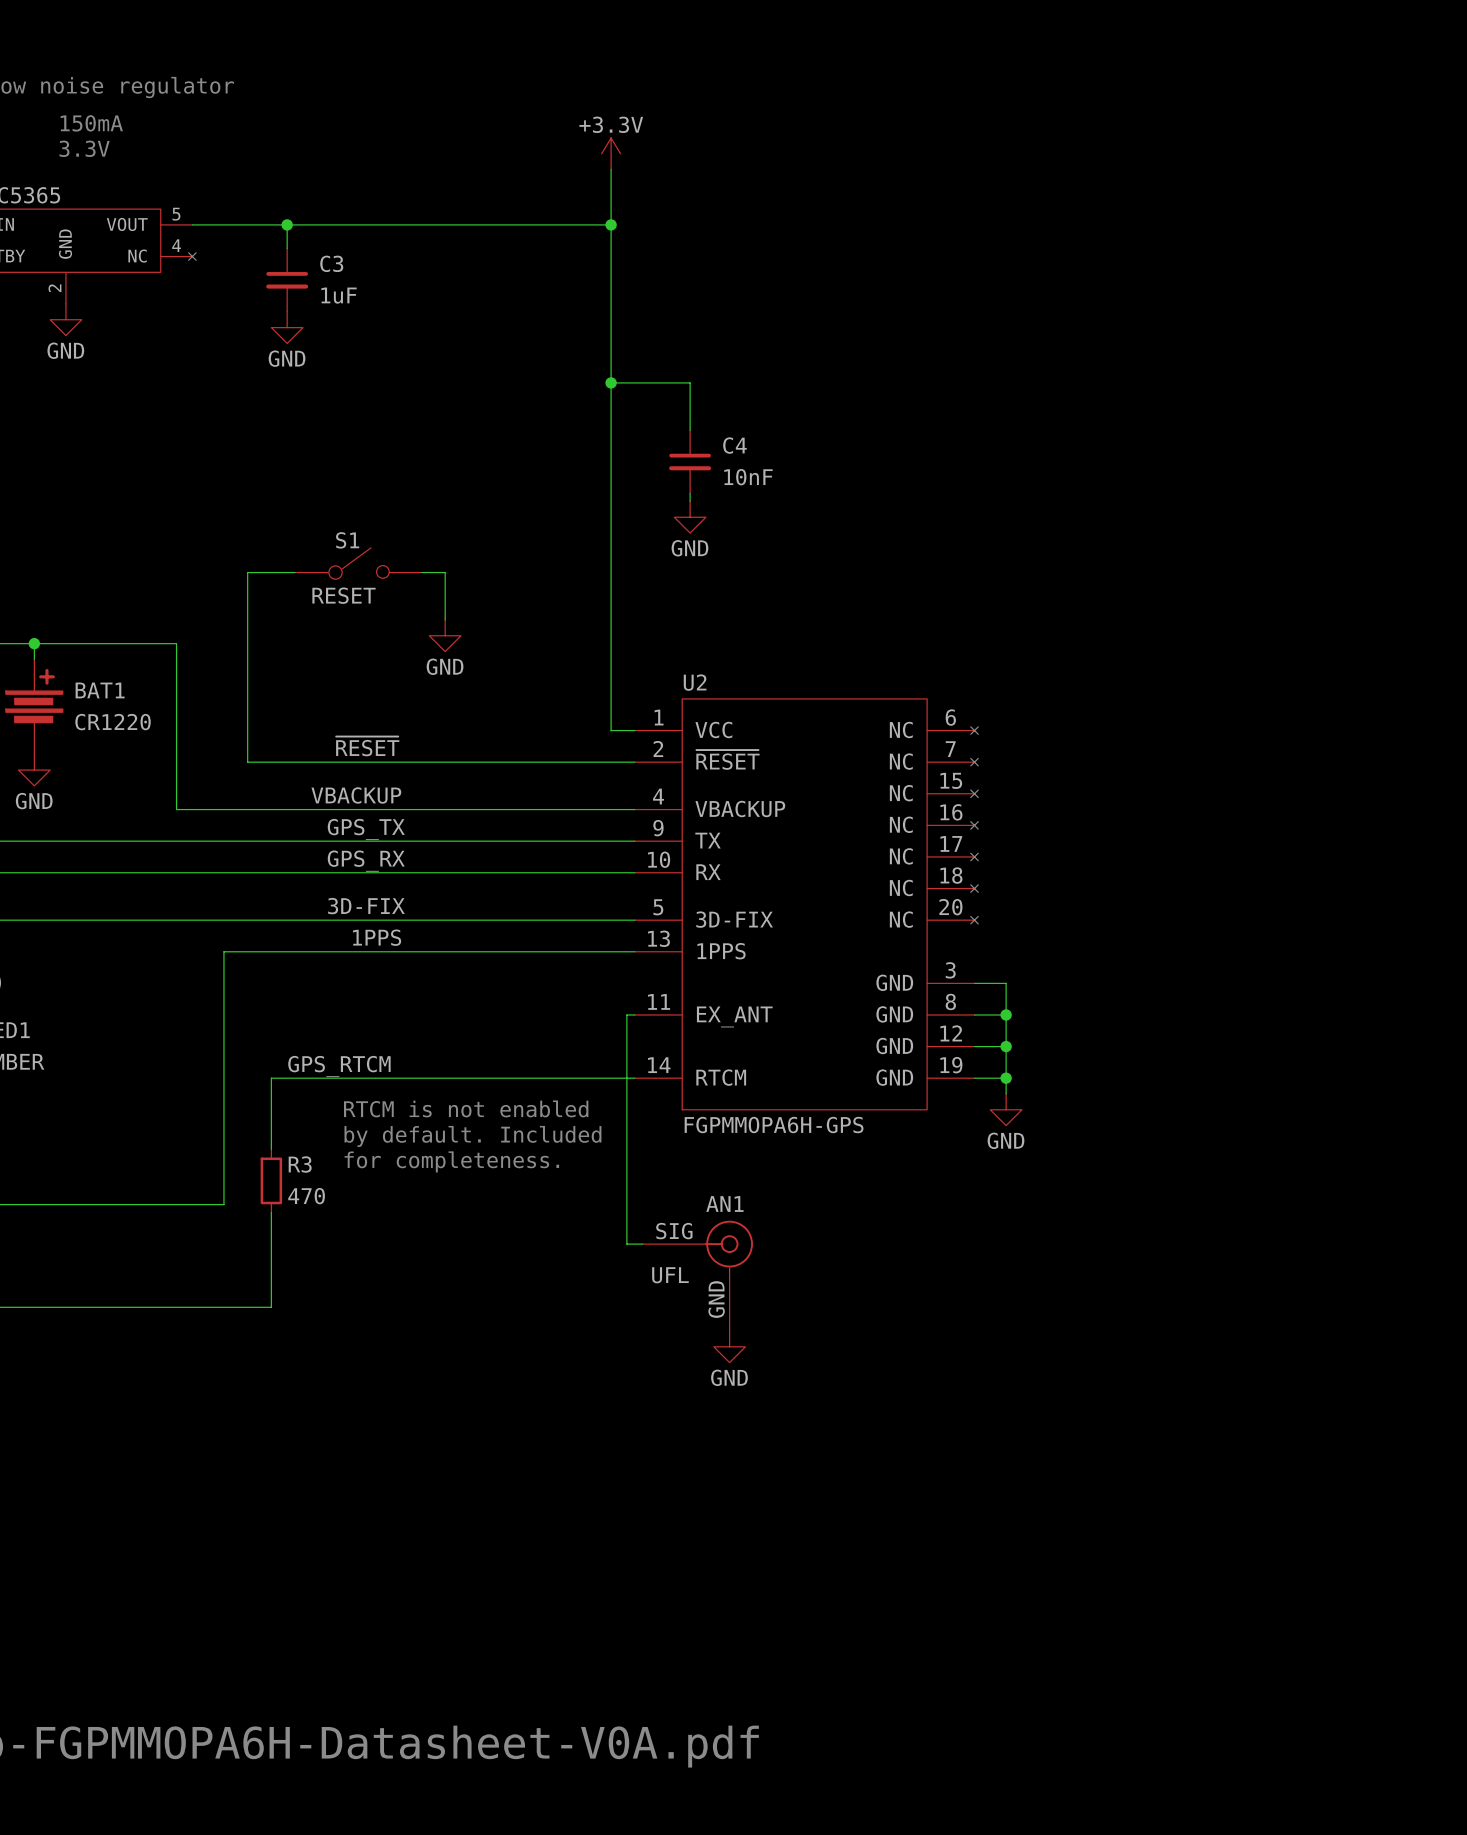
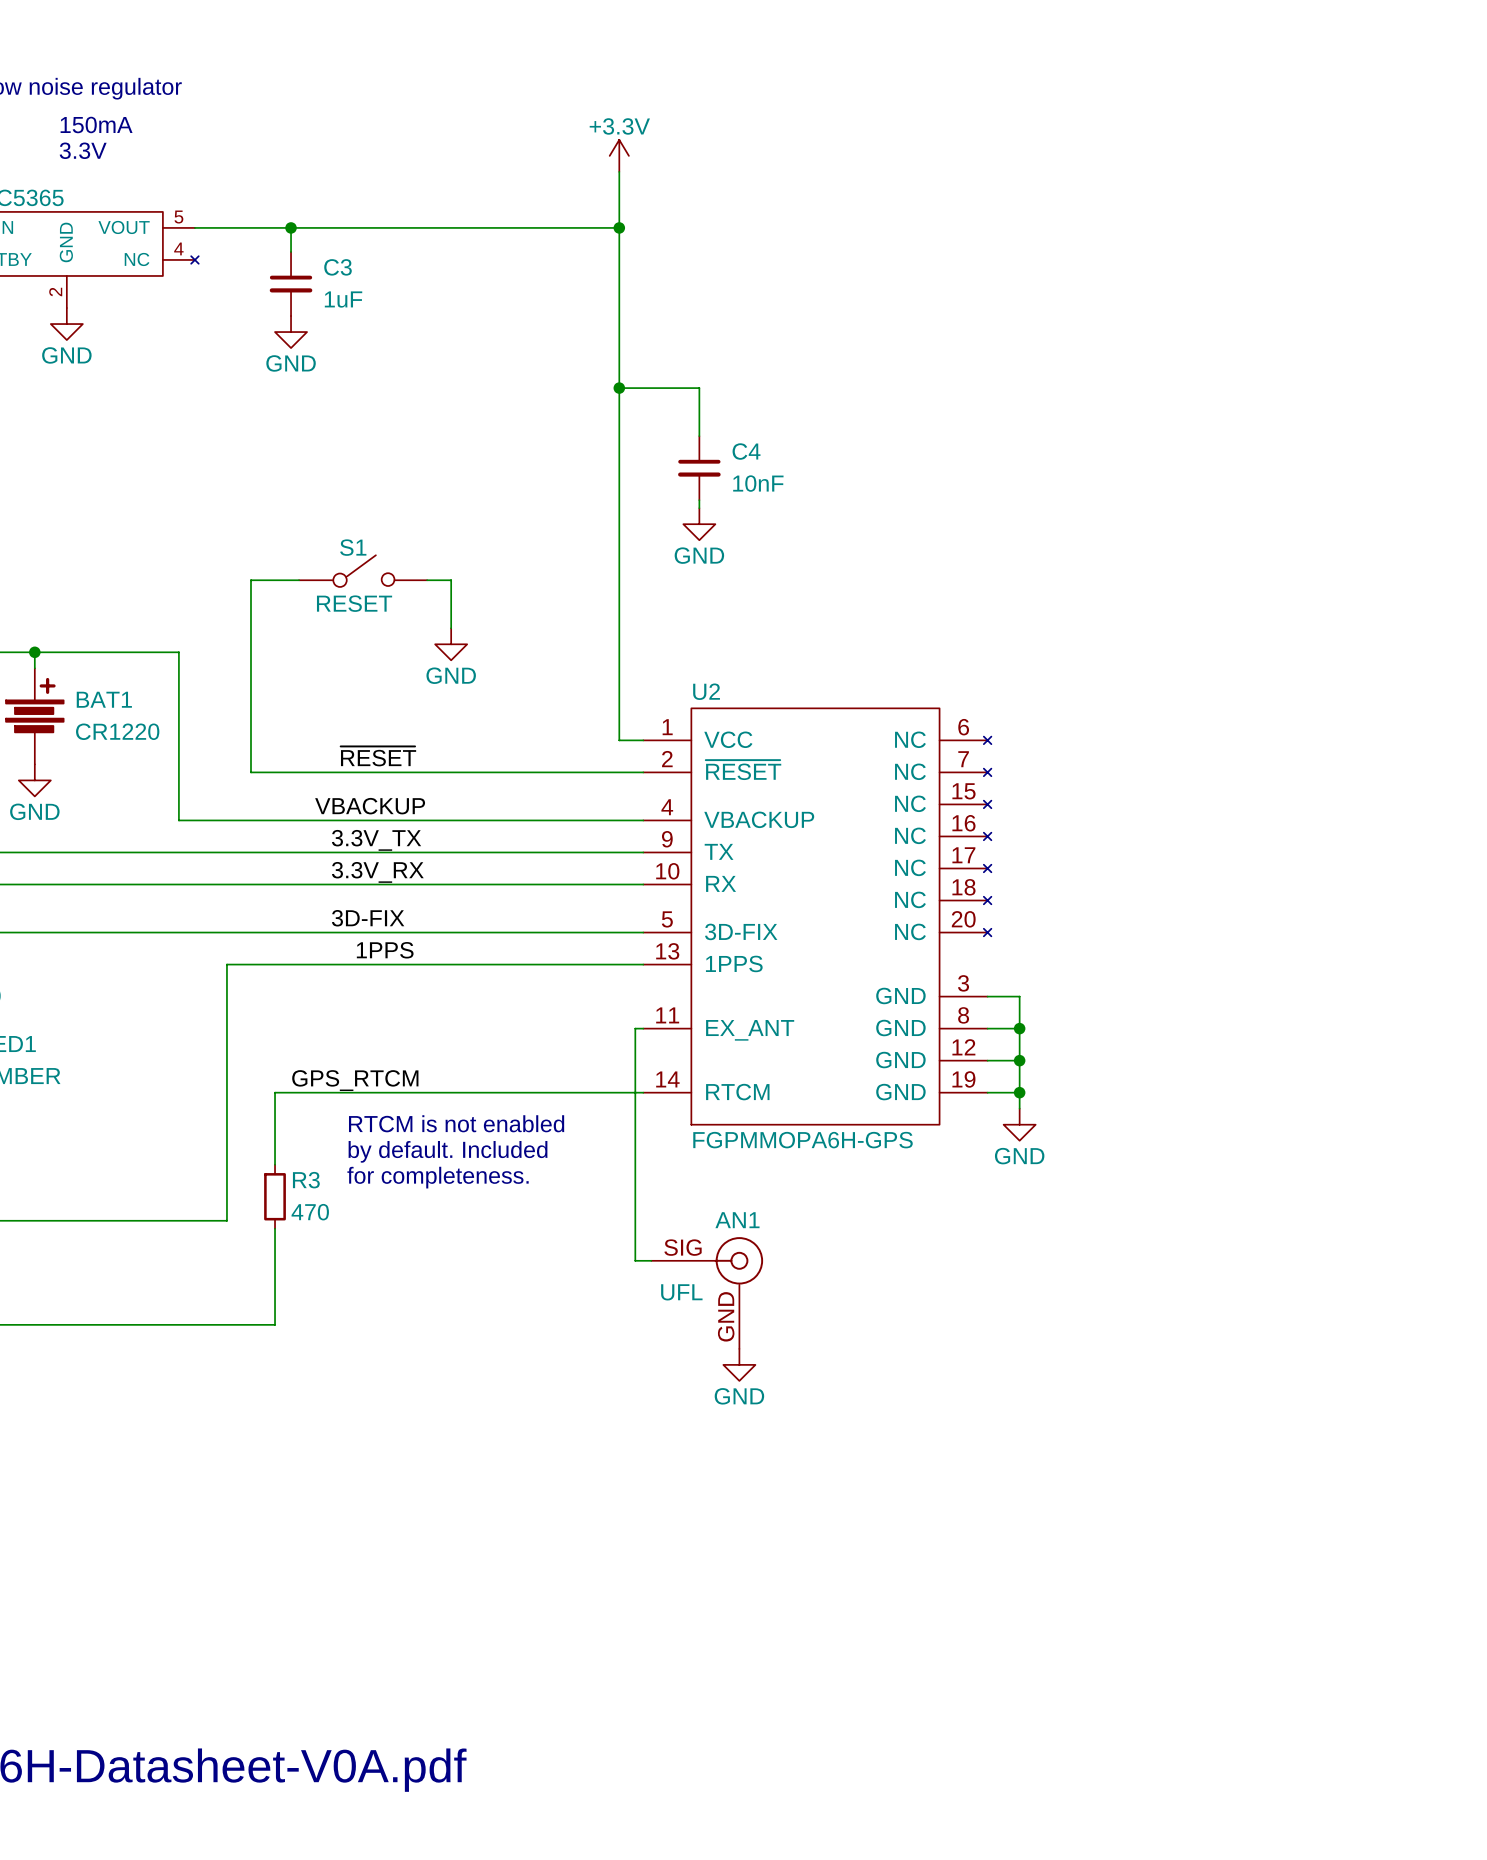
label: GPS_TX (366, 829) -> 3.3V_TX (376, 840)
label: GPS_RX (366, 861) -> 3.3V_RX (377, 872)

